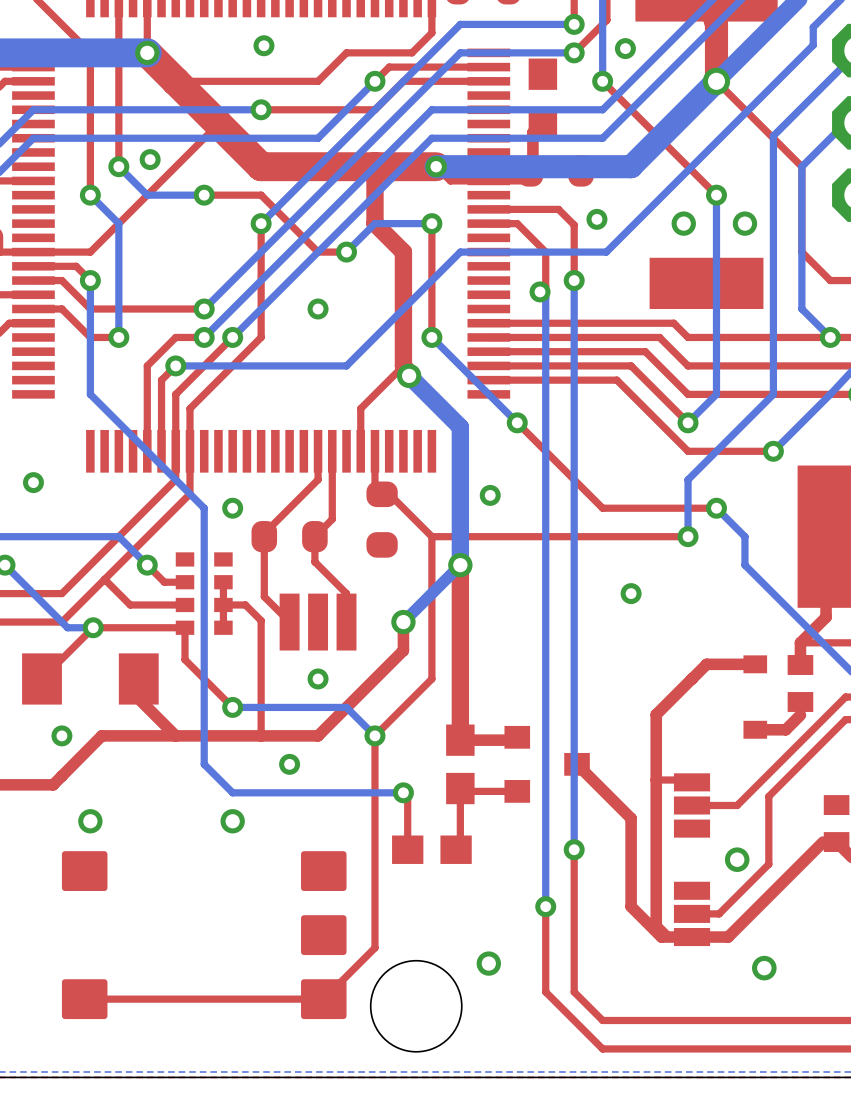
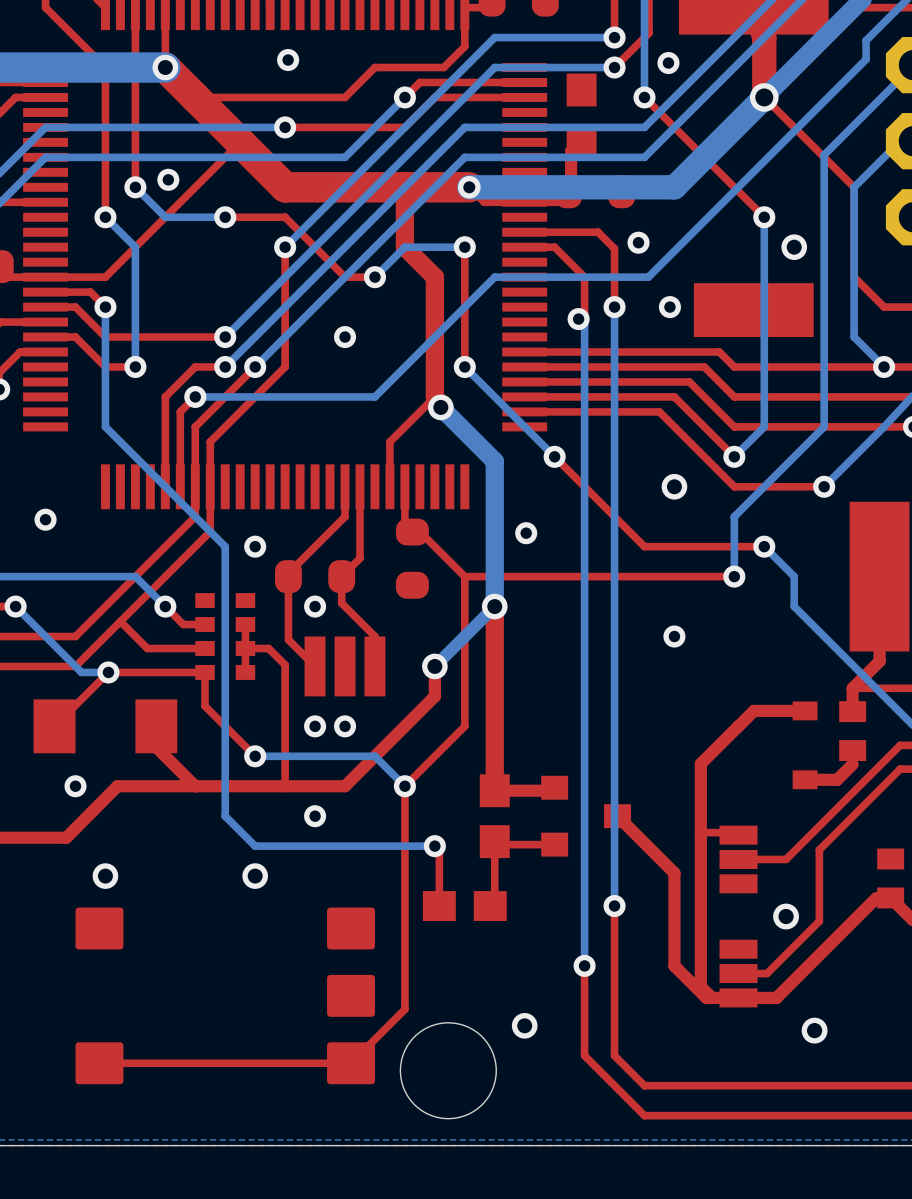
via: (683, 223) -> none
via: none -> (669, 307)
via: none -> (674, 486)
via: none -> (315, 606)
via: none -> (315, 726)

